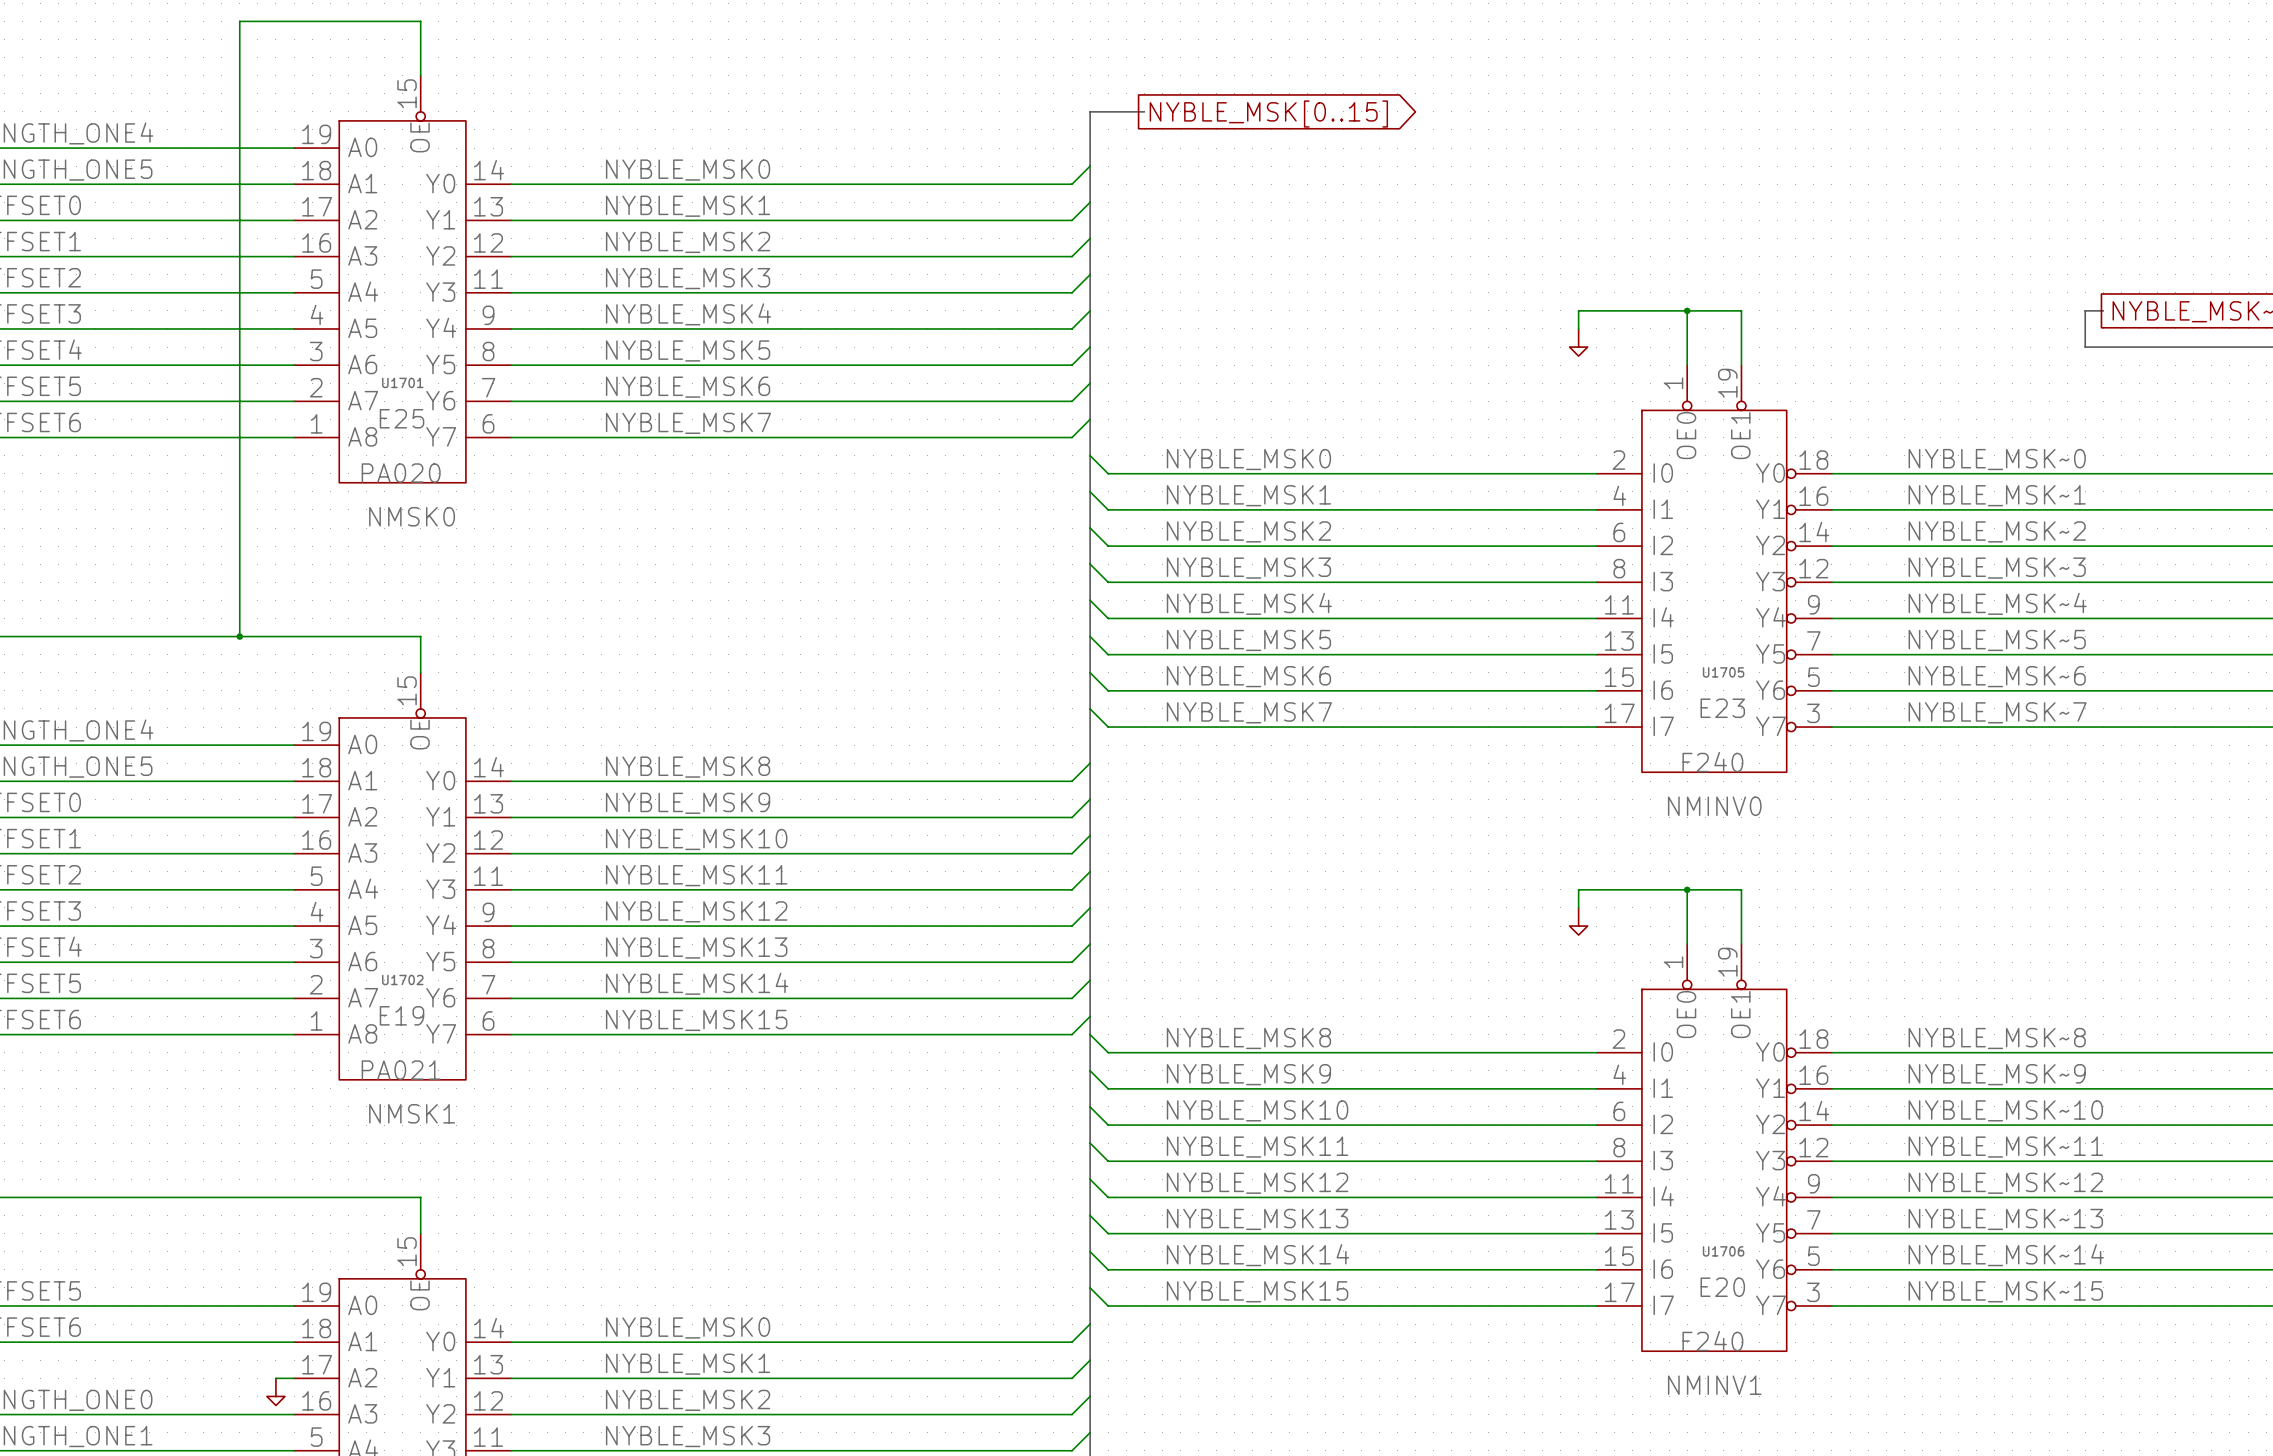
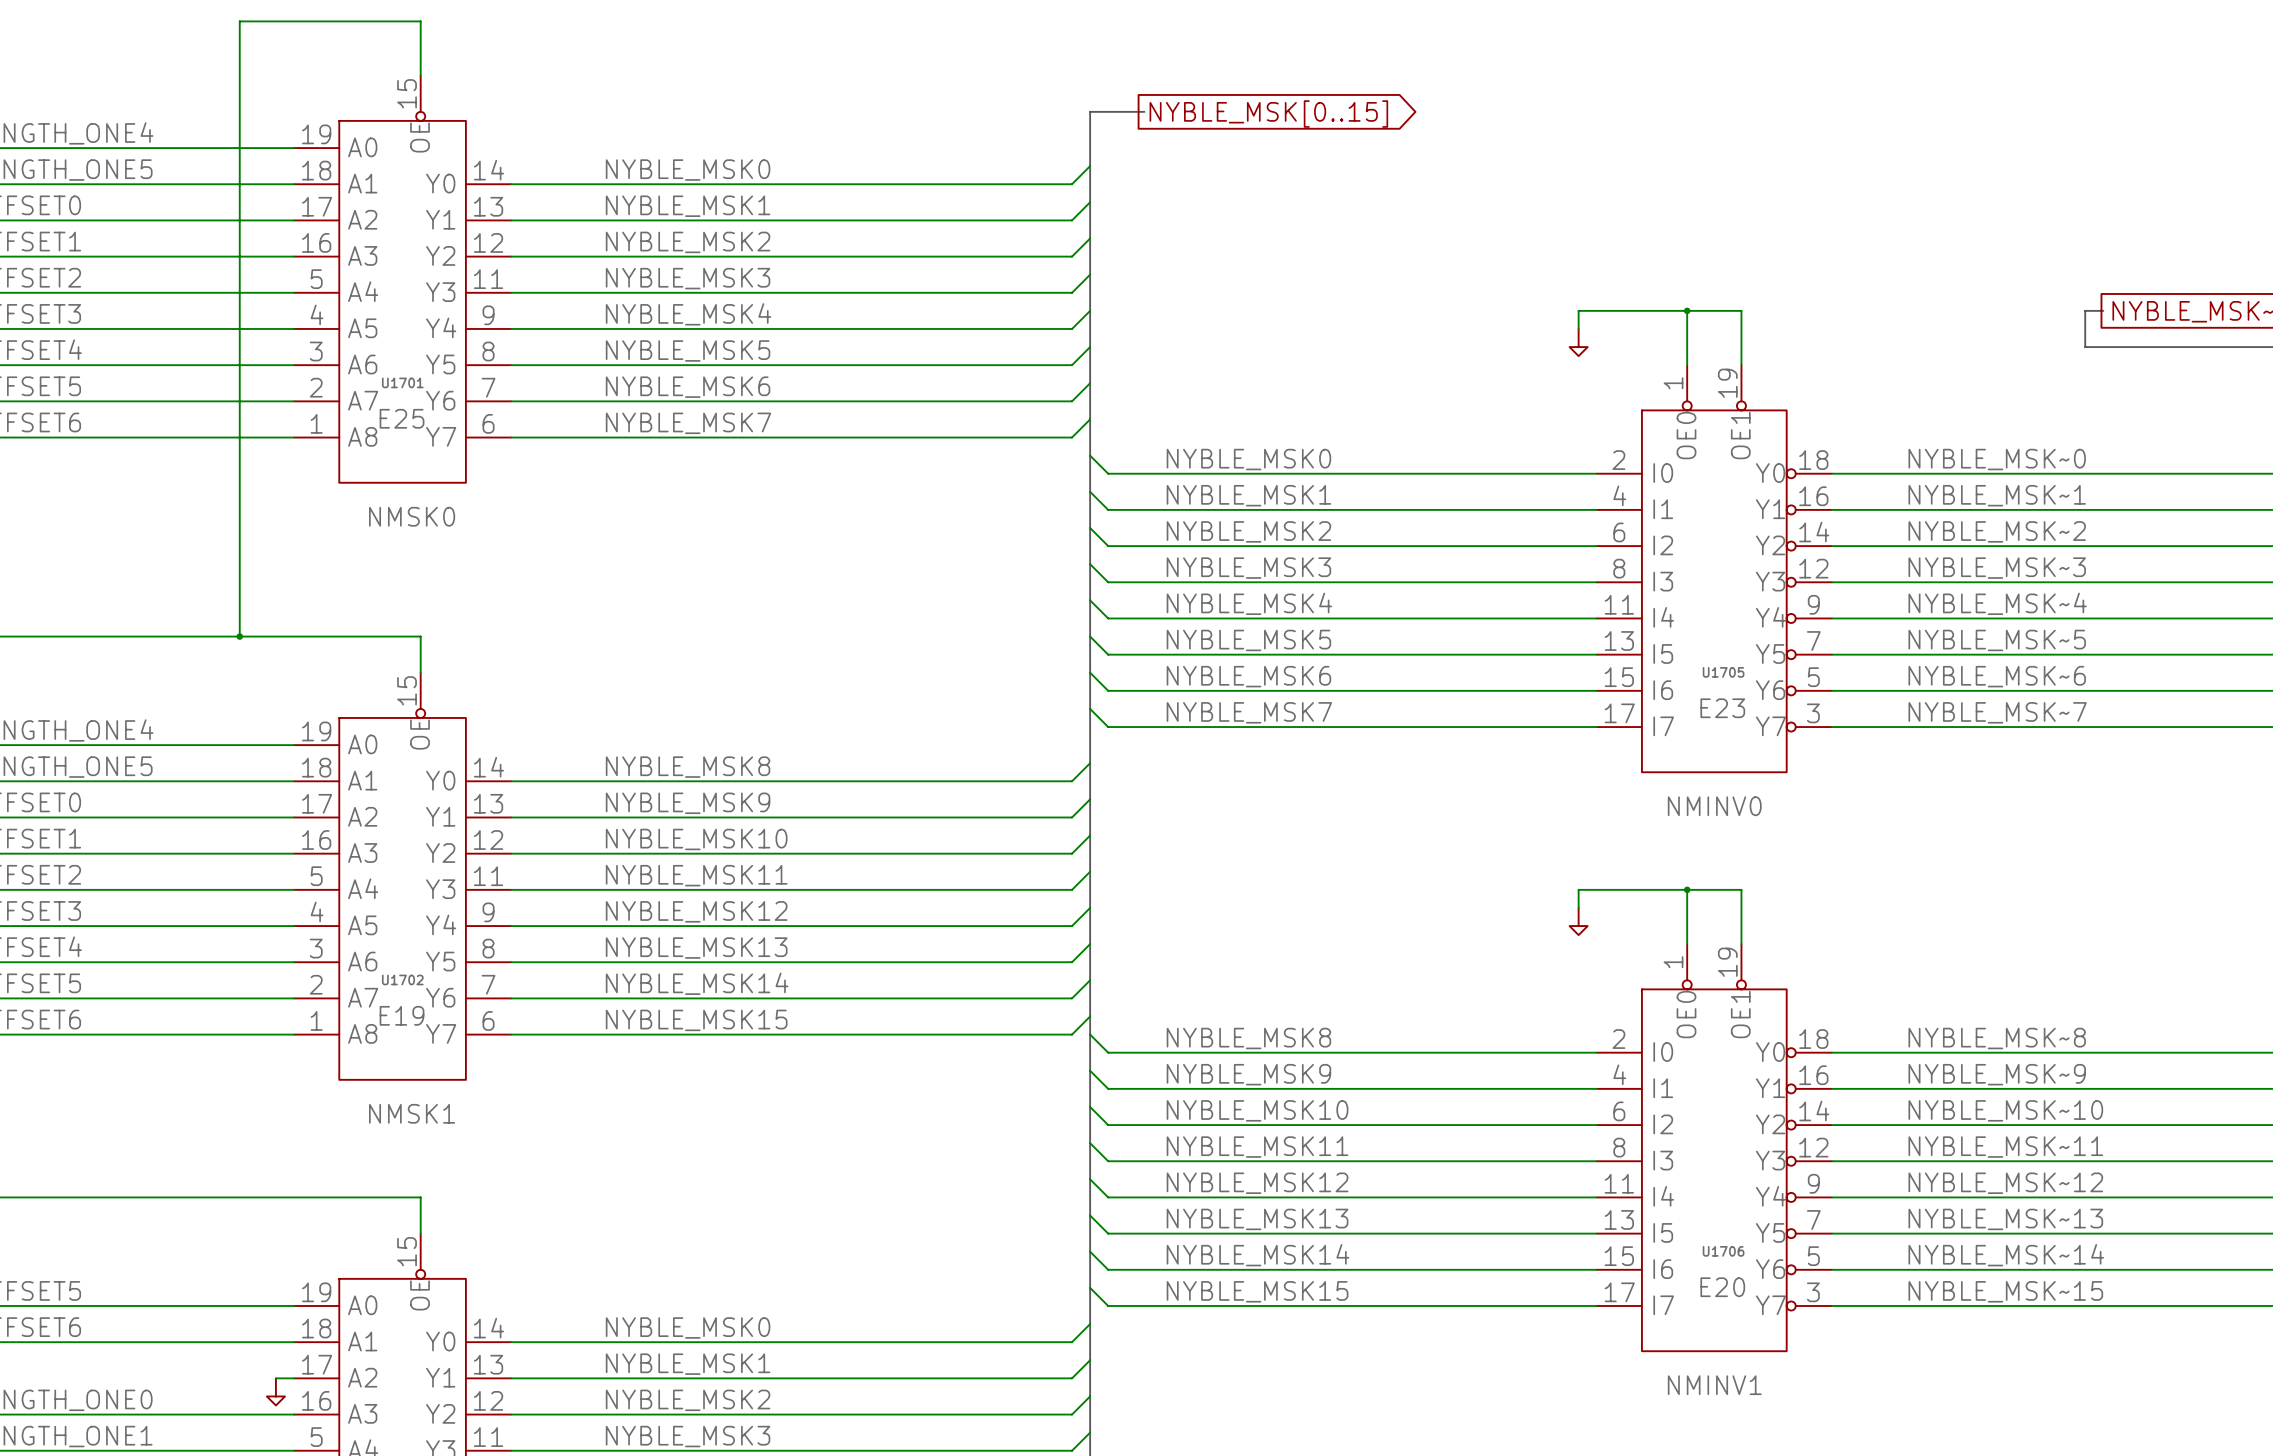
U1701 value: PA020 (401, 473) -> none
U1705 value: F240 (1712, 762) -> none
U1702 value: PA021 (401, 1070) -> none
U1706 value: F240 (1712, 1341) -> none

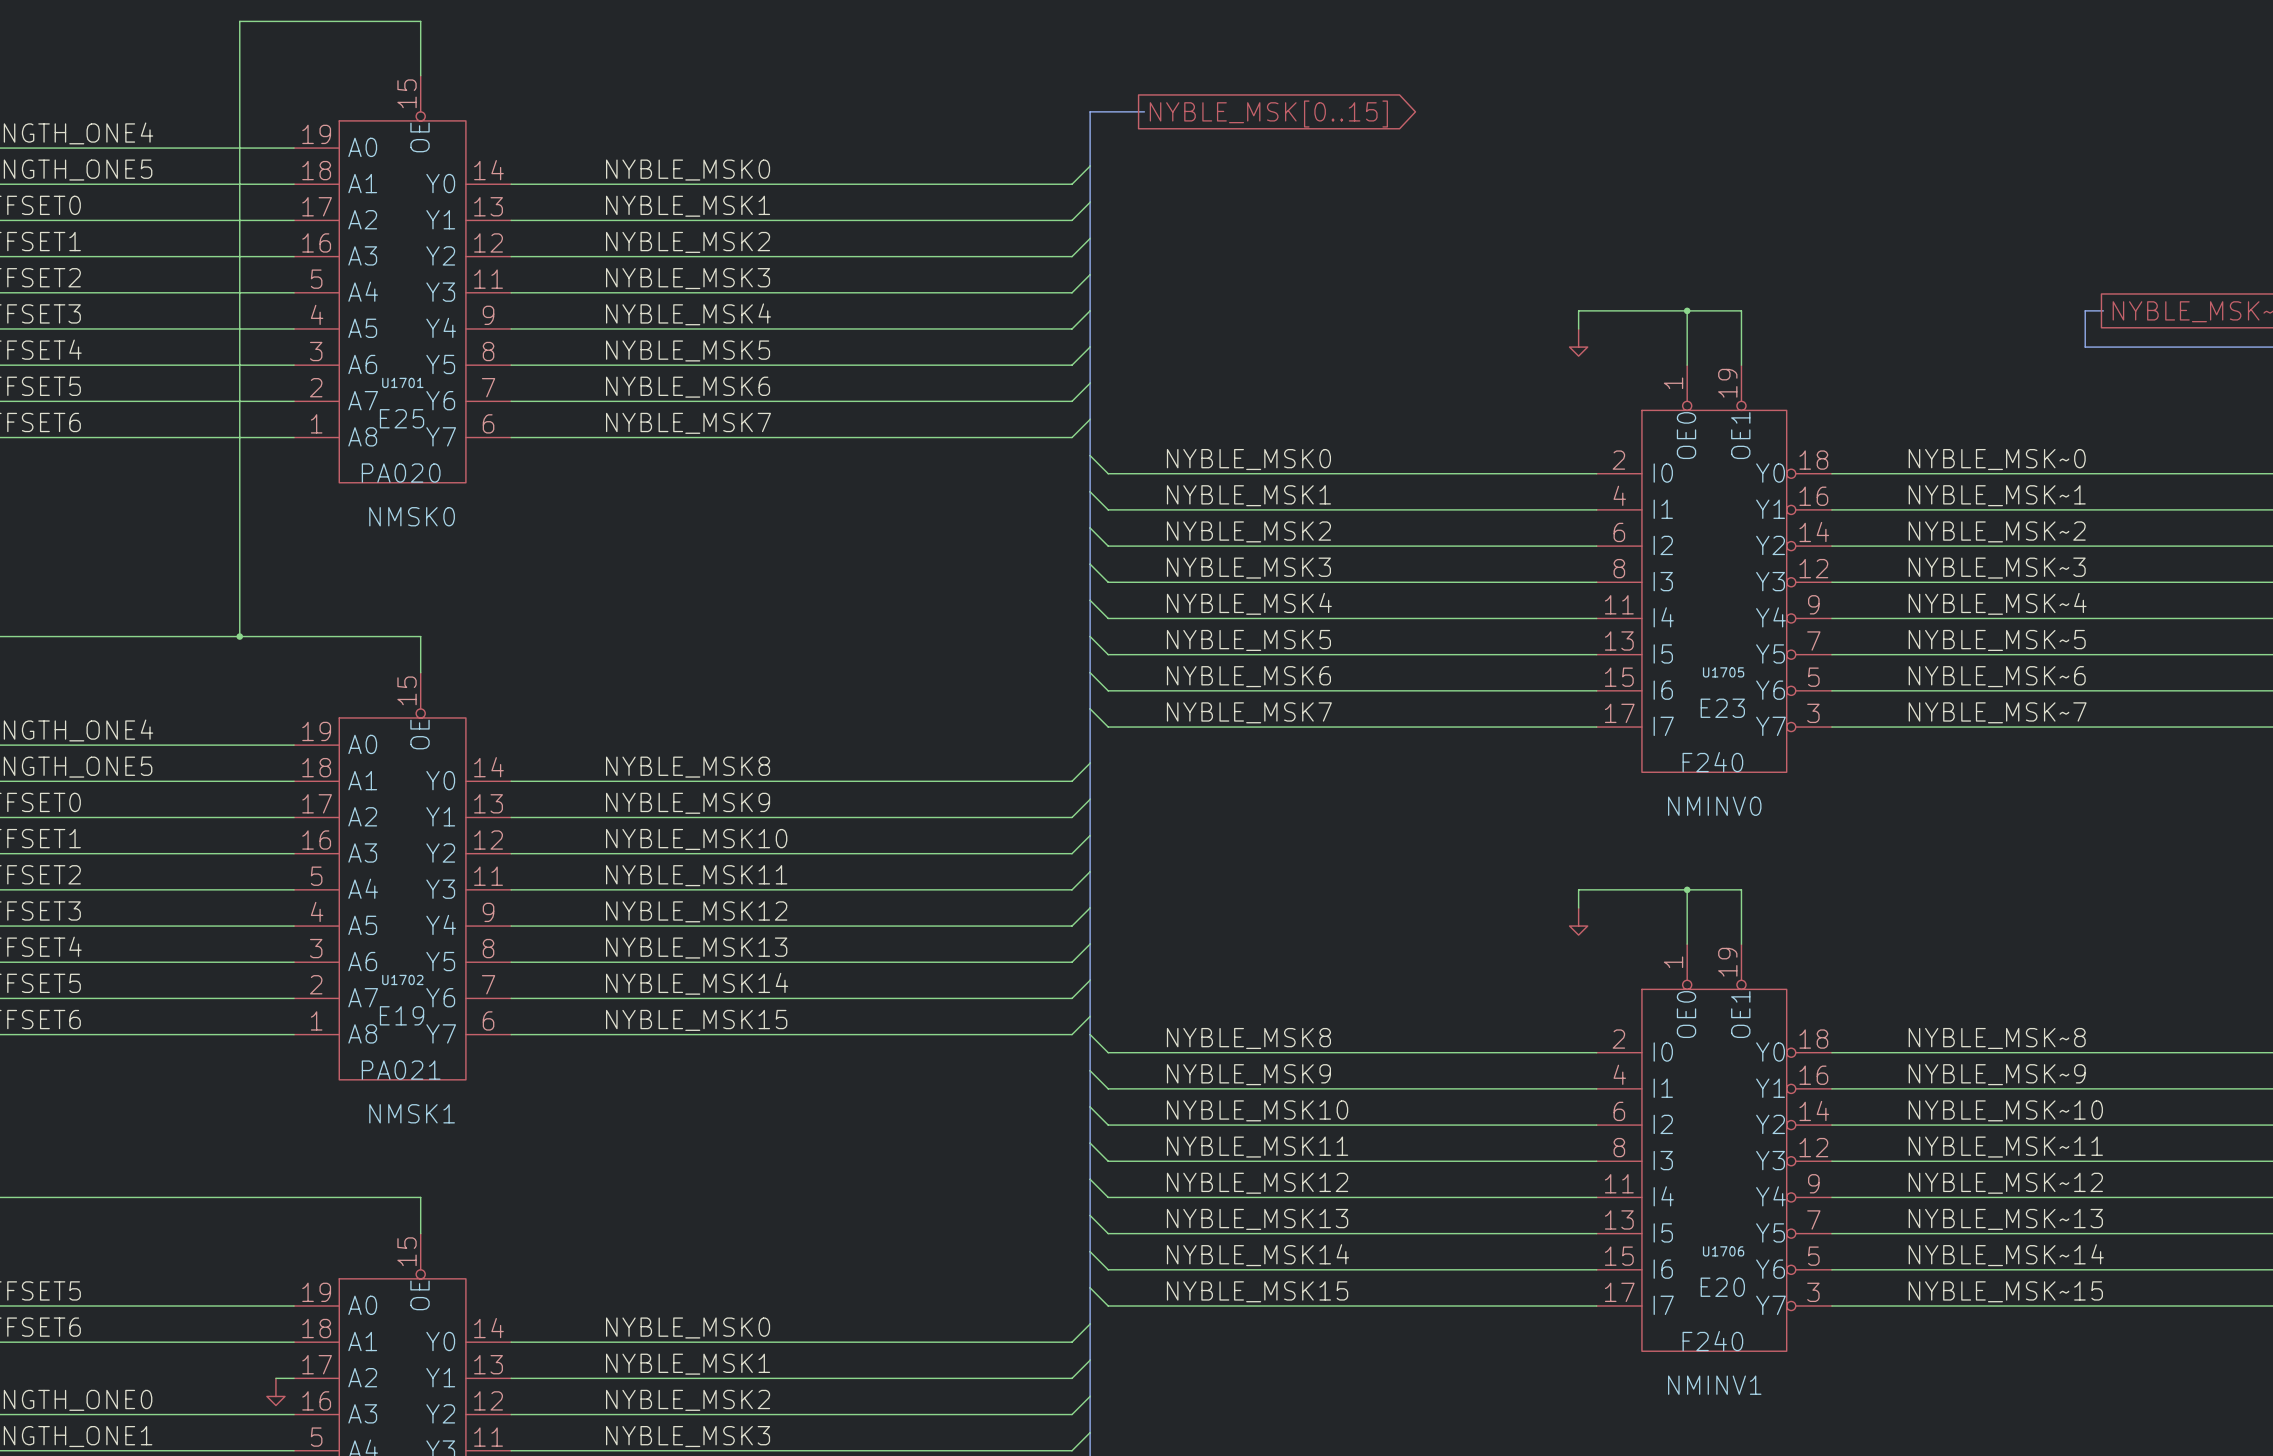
U1701 value: none -> PA020 (401, 473)
U1705 value: none -> F240 (1712, 762)
U1702 value: none -> PA021 (401, 1070)
U1706 value: none -> F240 (1712, 1341)

